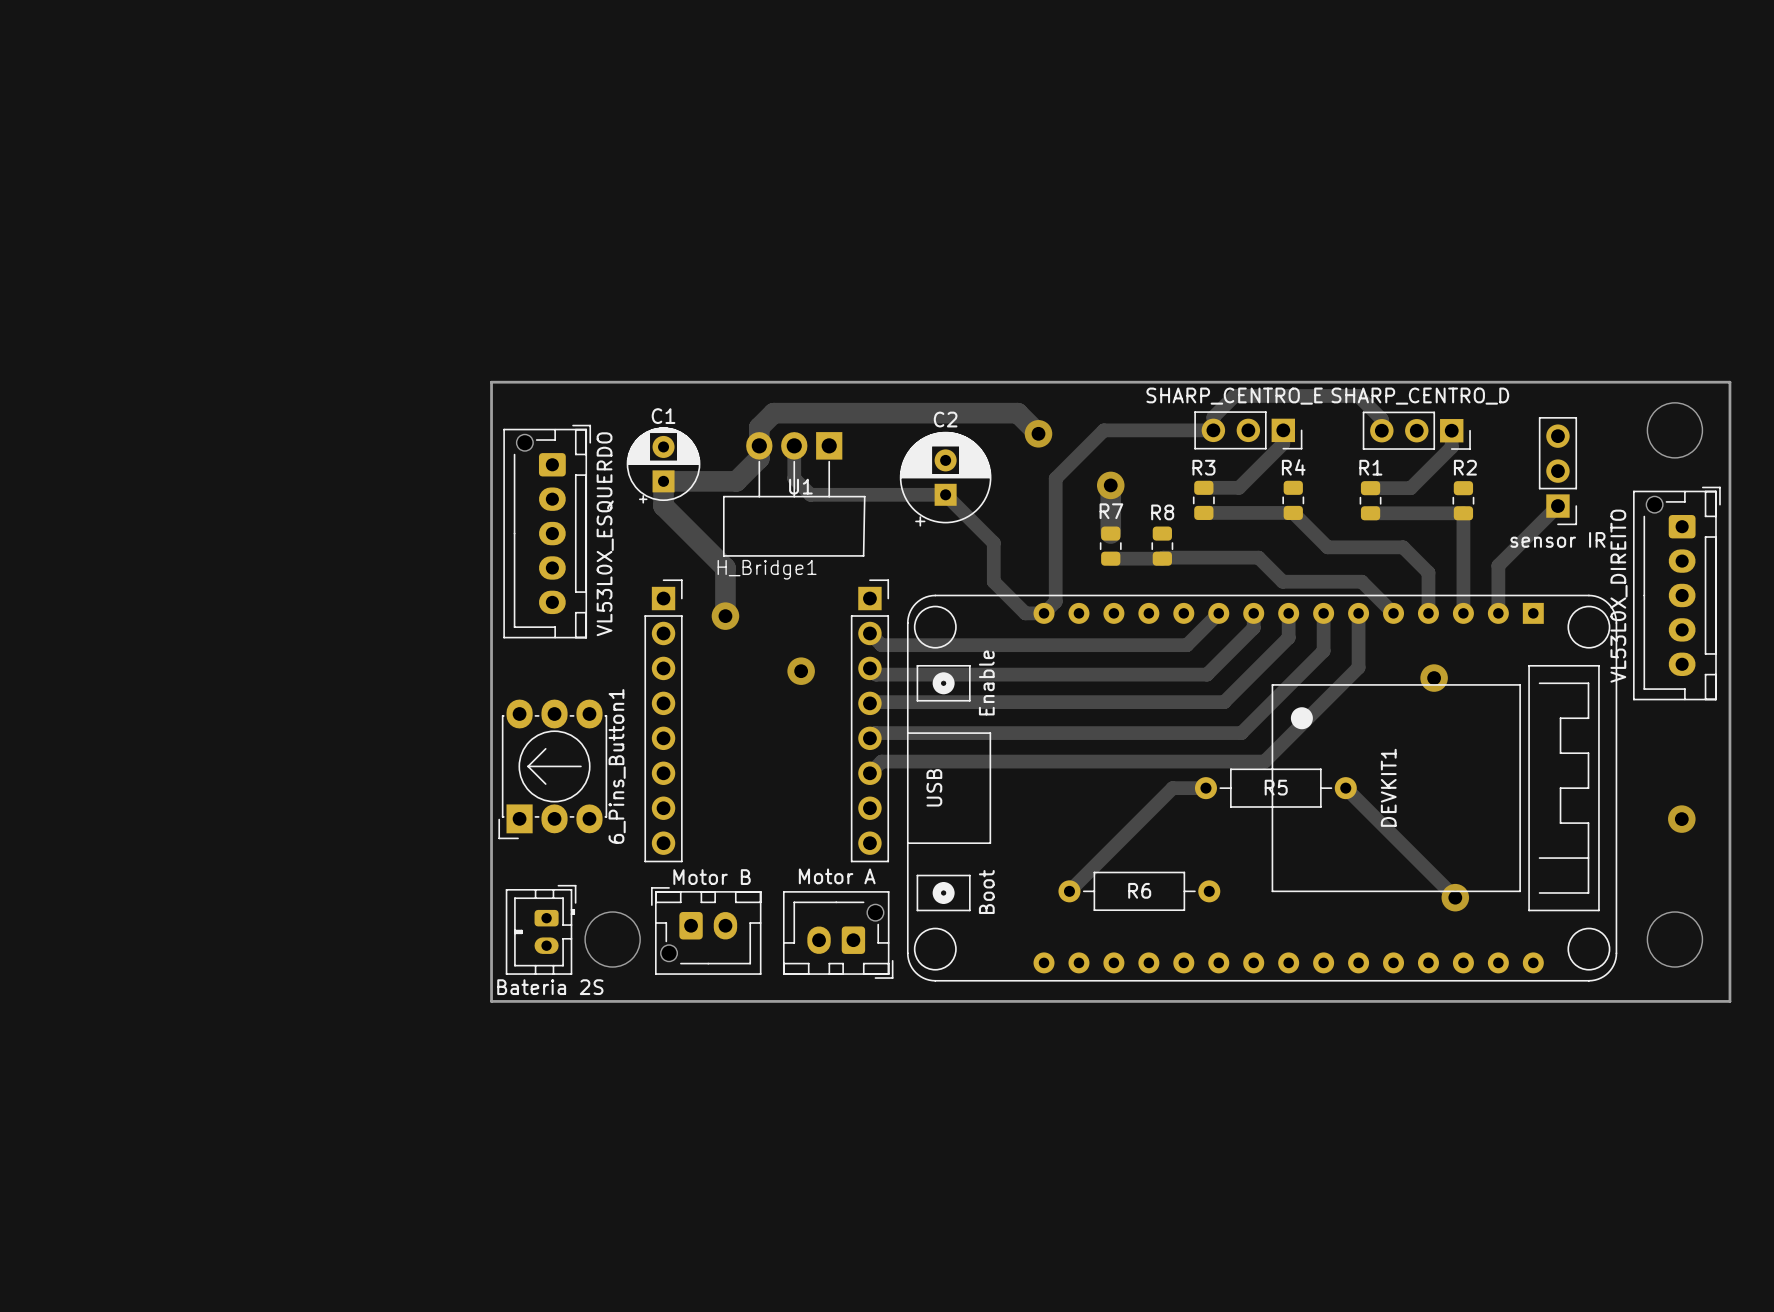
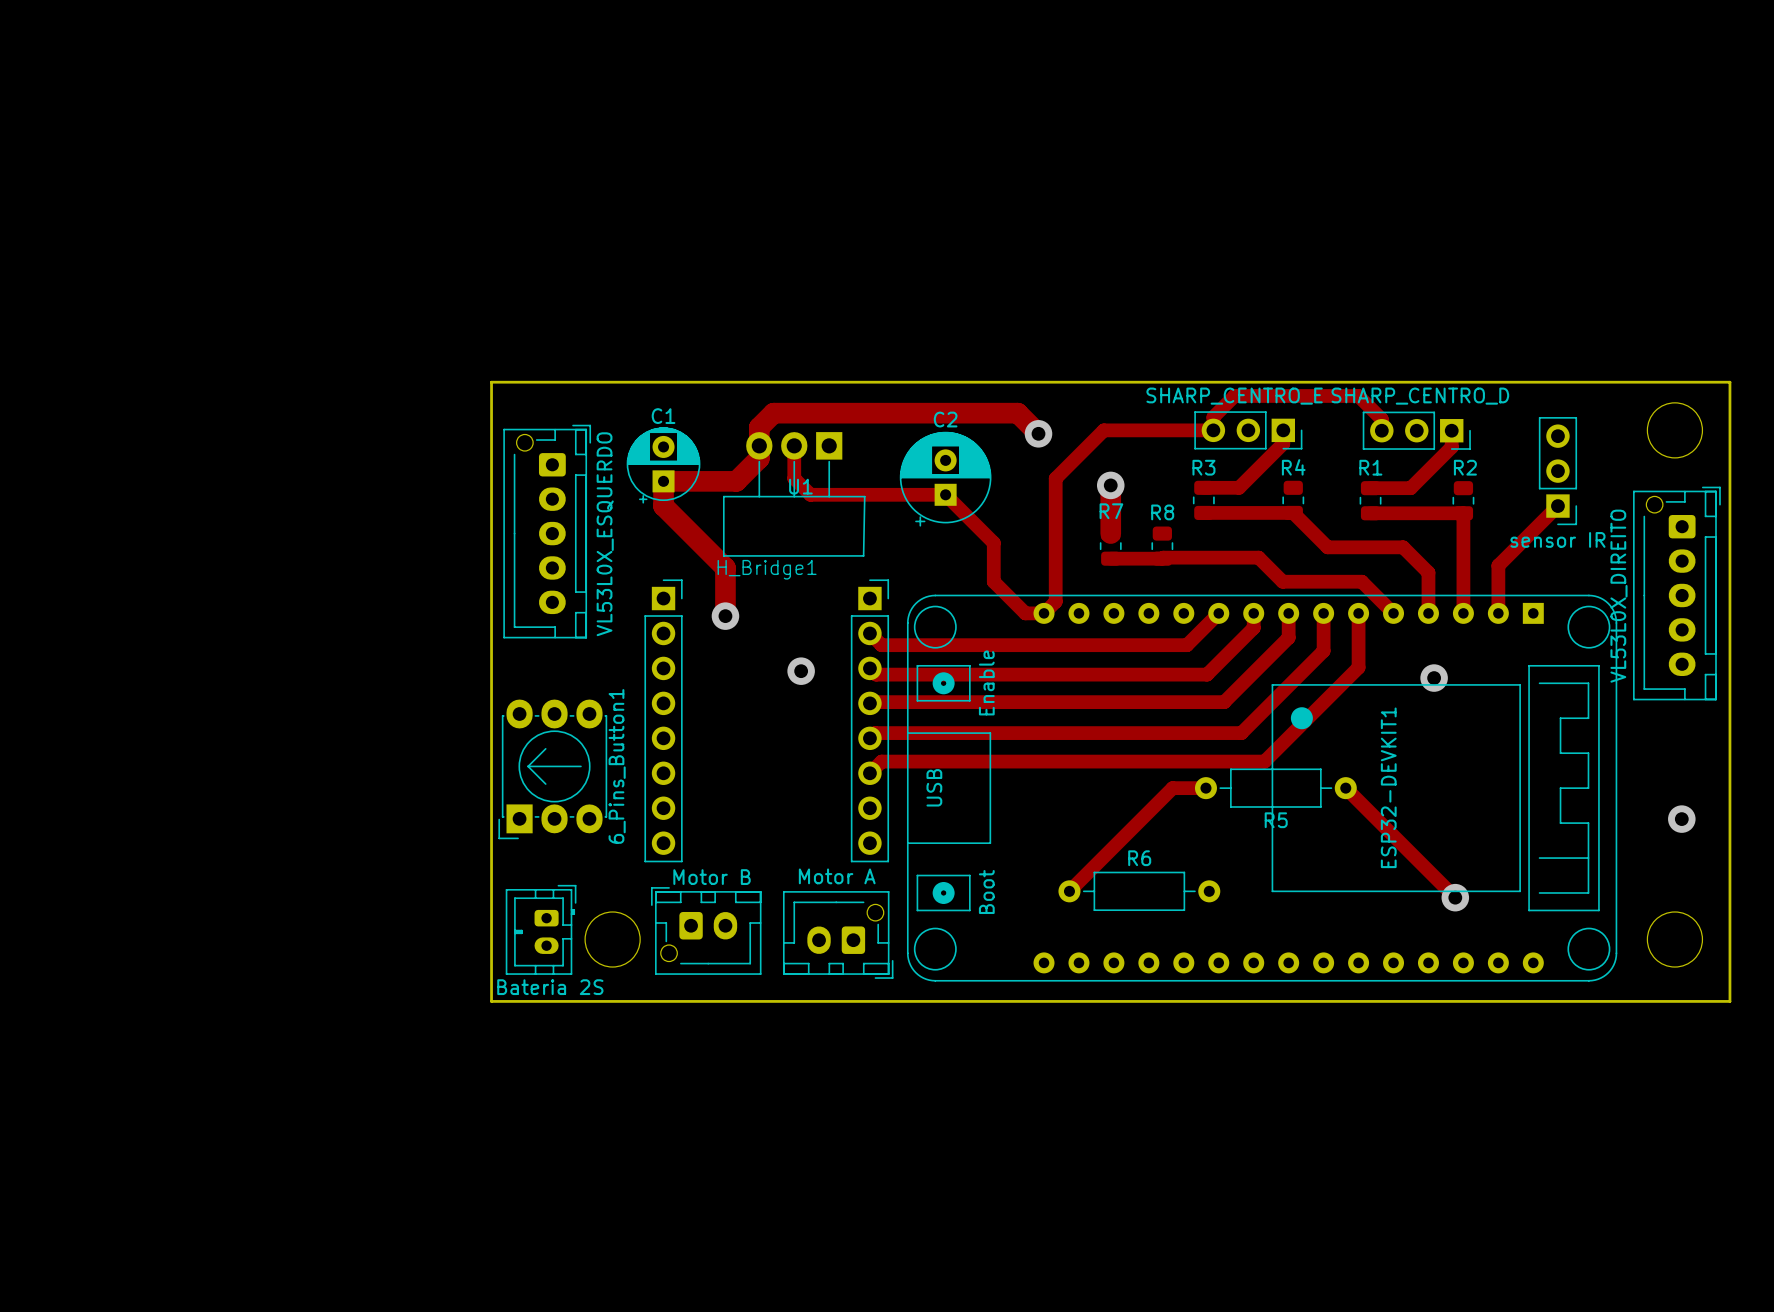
R5 name position: R5 (1276, 787) -> R5 (1276, 820)
DEVKIT1 name: DEVKIT1 (1388, 787) -> ESP32-DEVKIT1 (1388, 787)
R6 name position: R6 (1139, 890) -> R6 (1139, 858)

